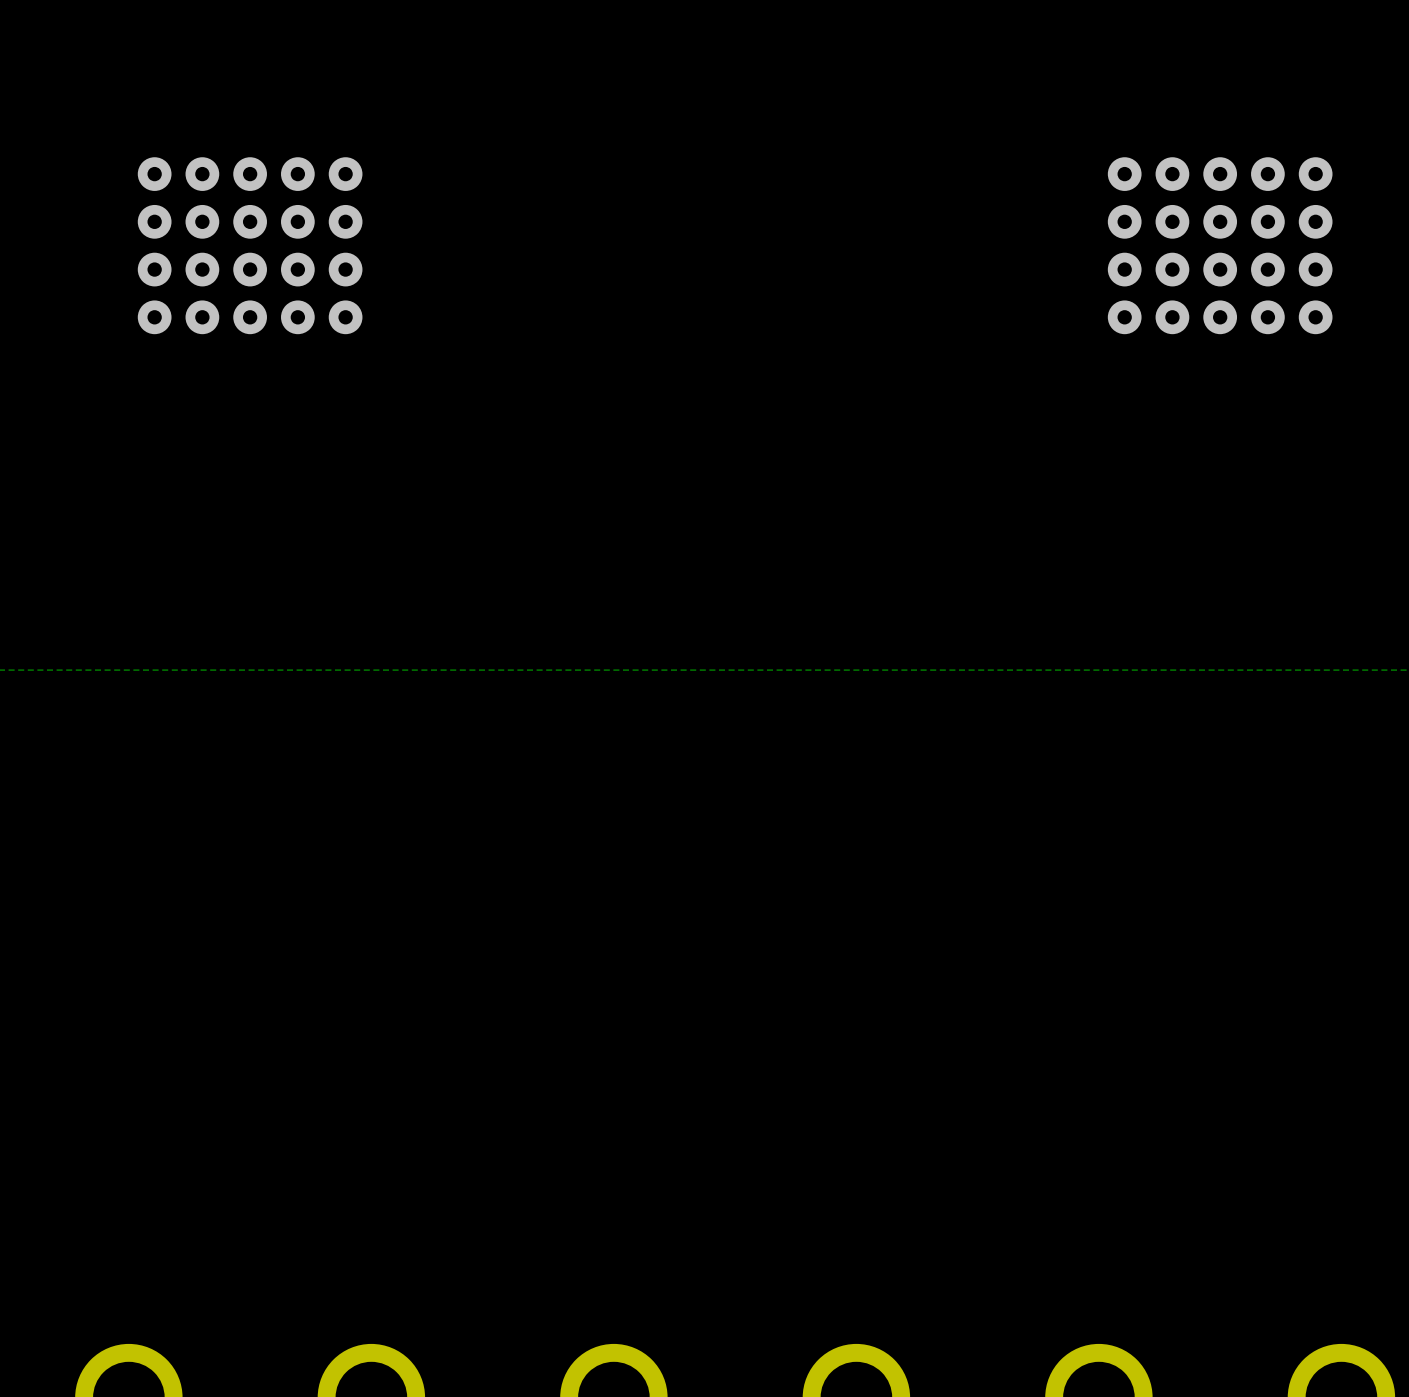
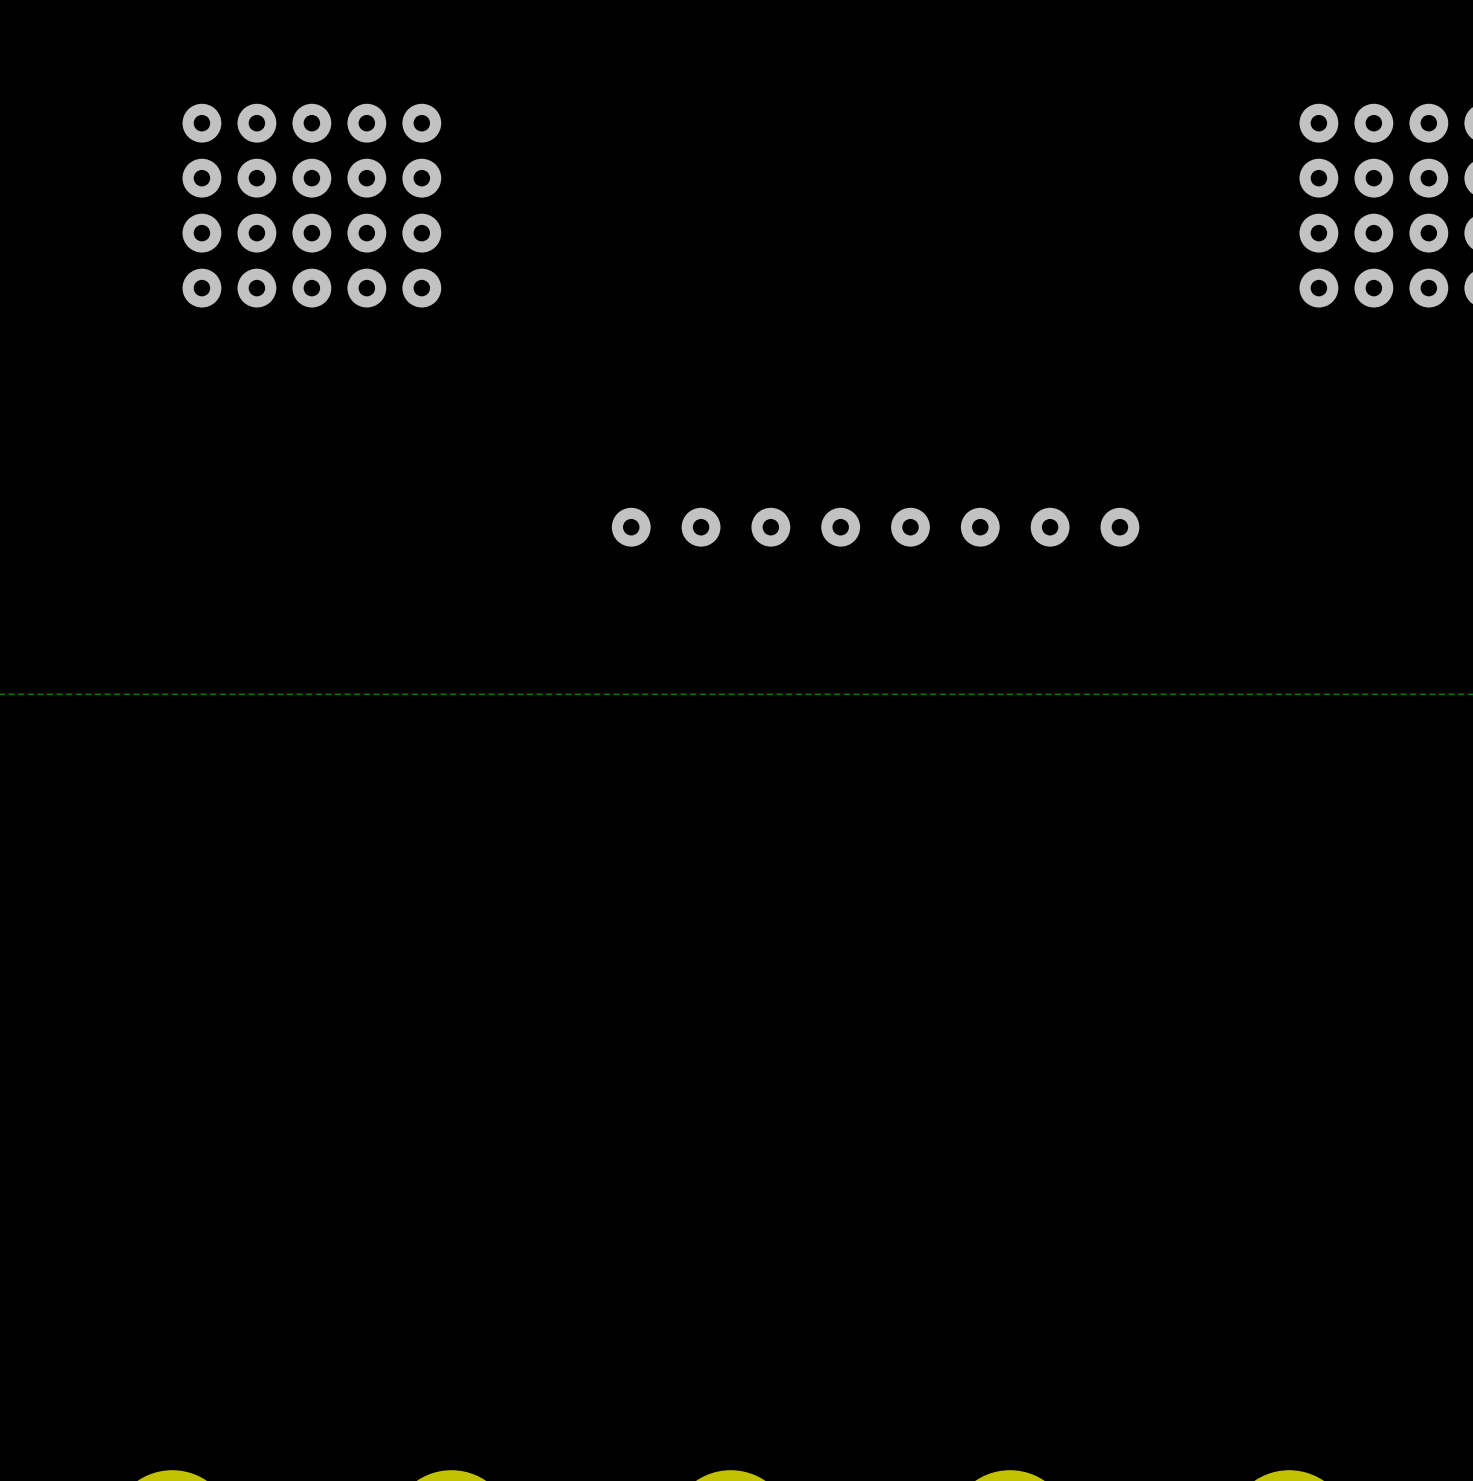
via: none -> (631, 527)
via: none -> (701, 527)
via: none -> (770, 527)
via: none -> (840, 527)
via: none -> (910, 527)
via: none -> (980, 527)
via: none -> (1050, 527)
via: none -> (1119, 527)

